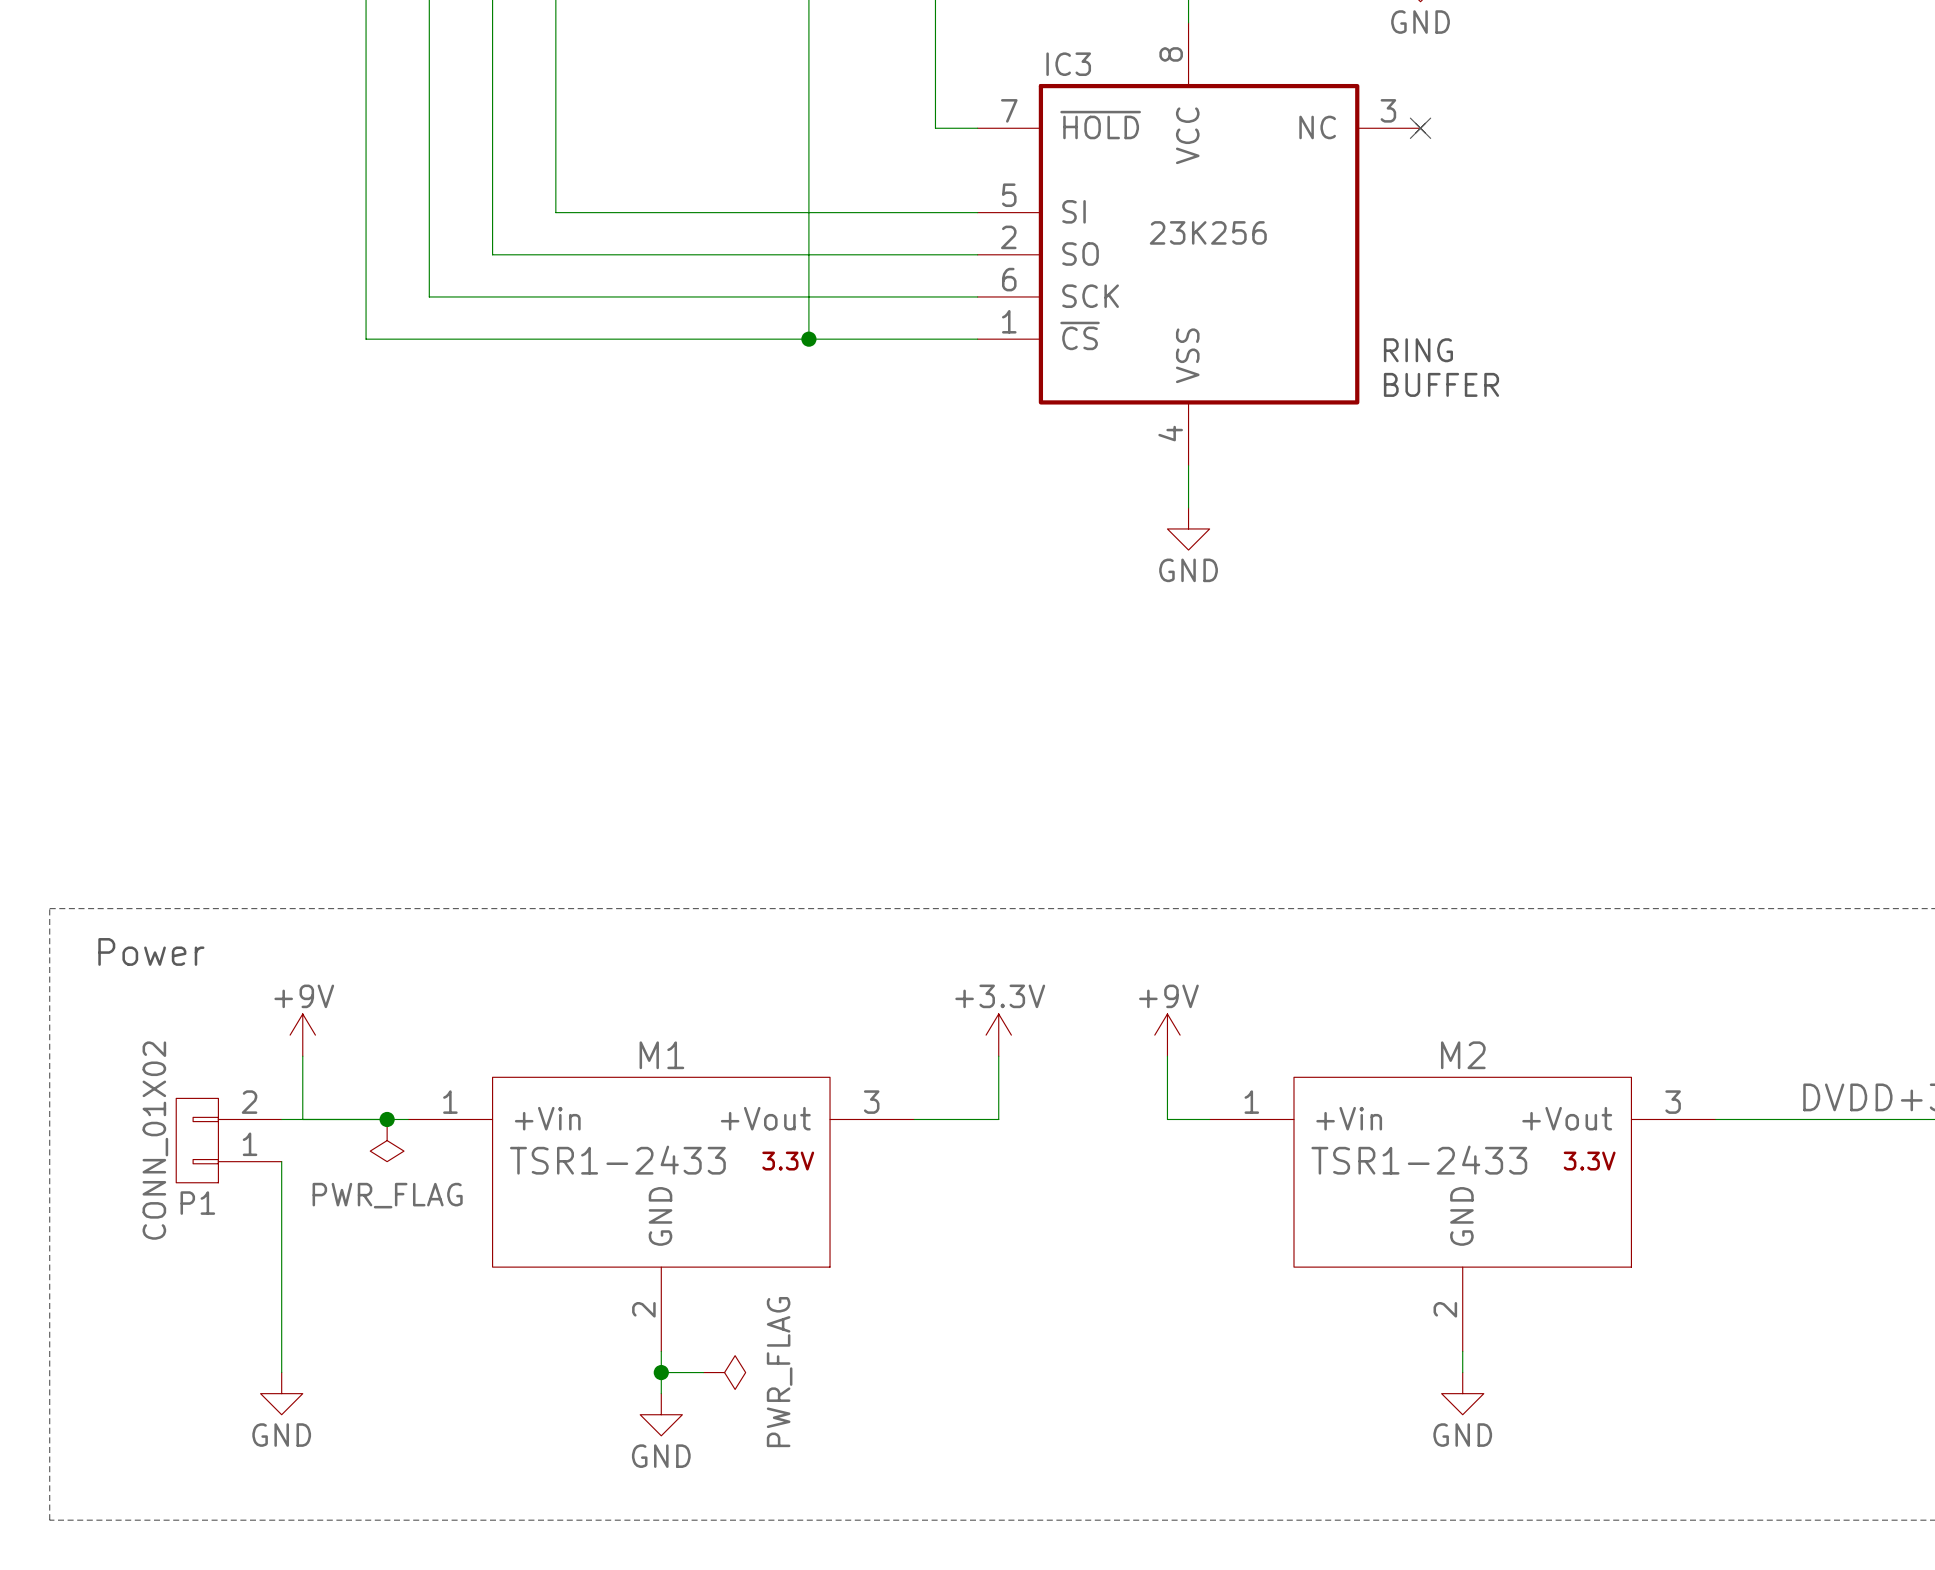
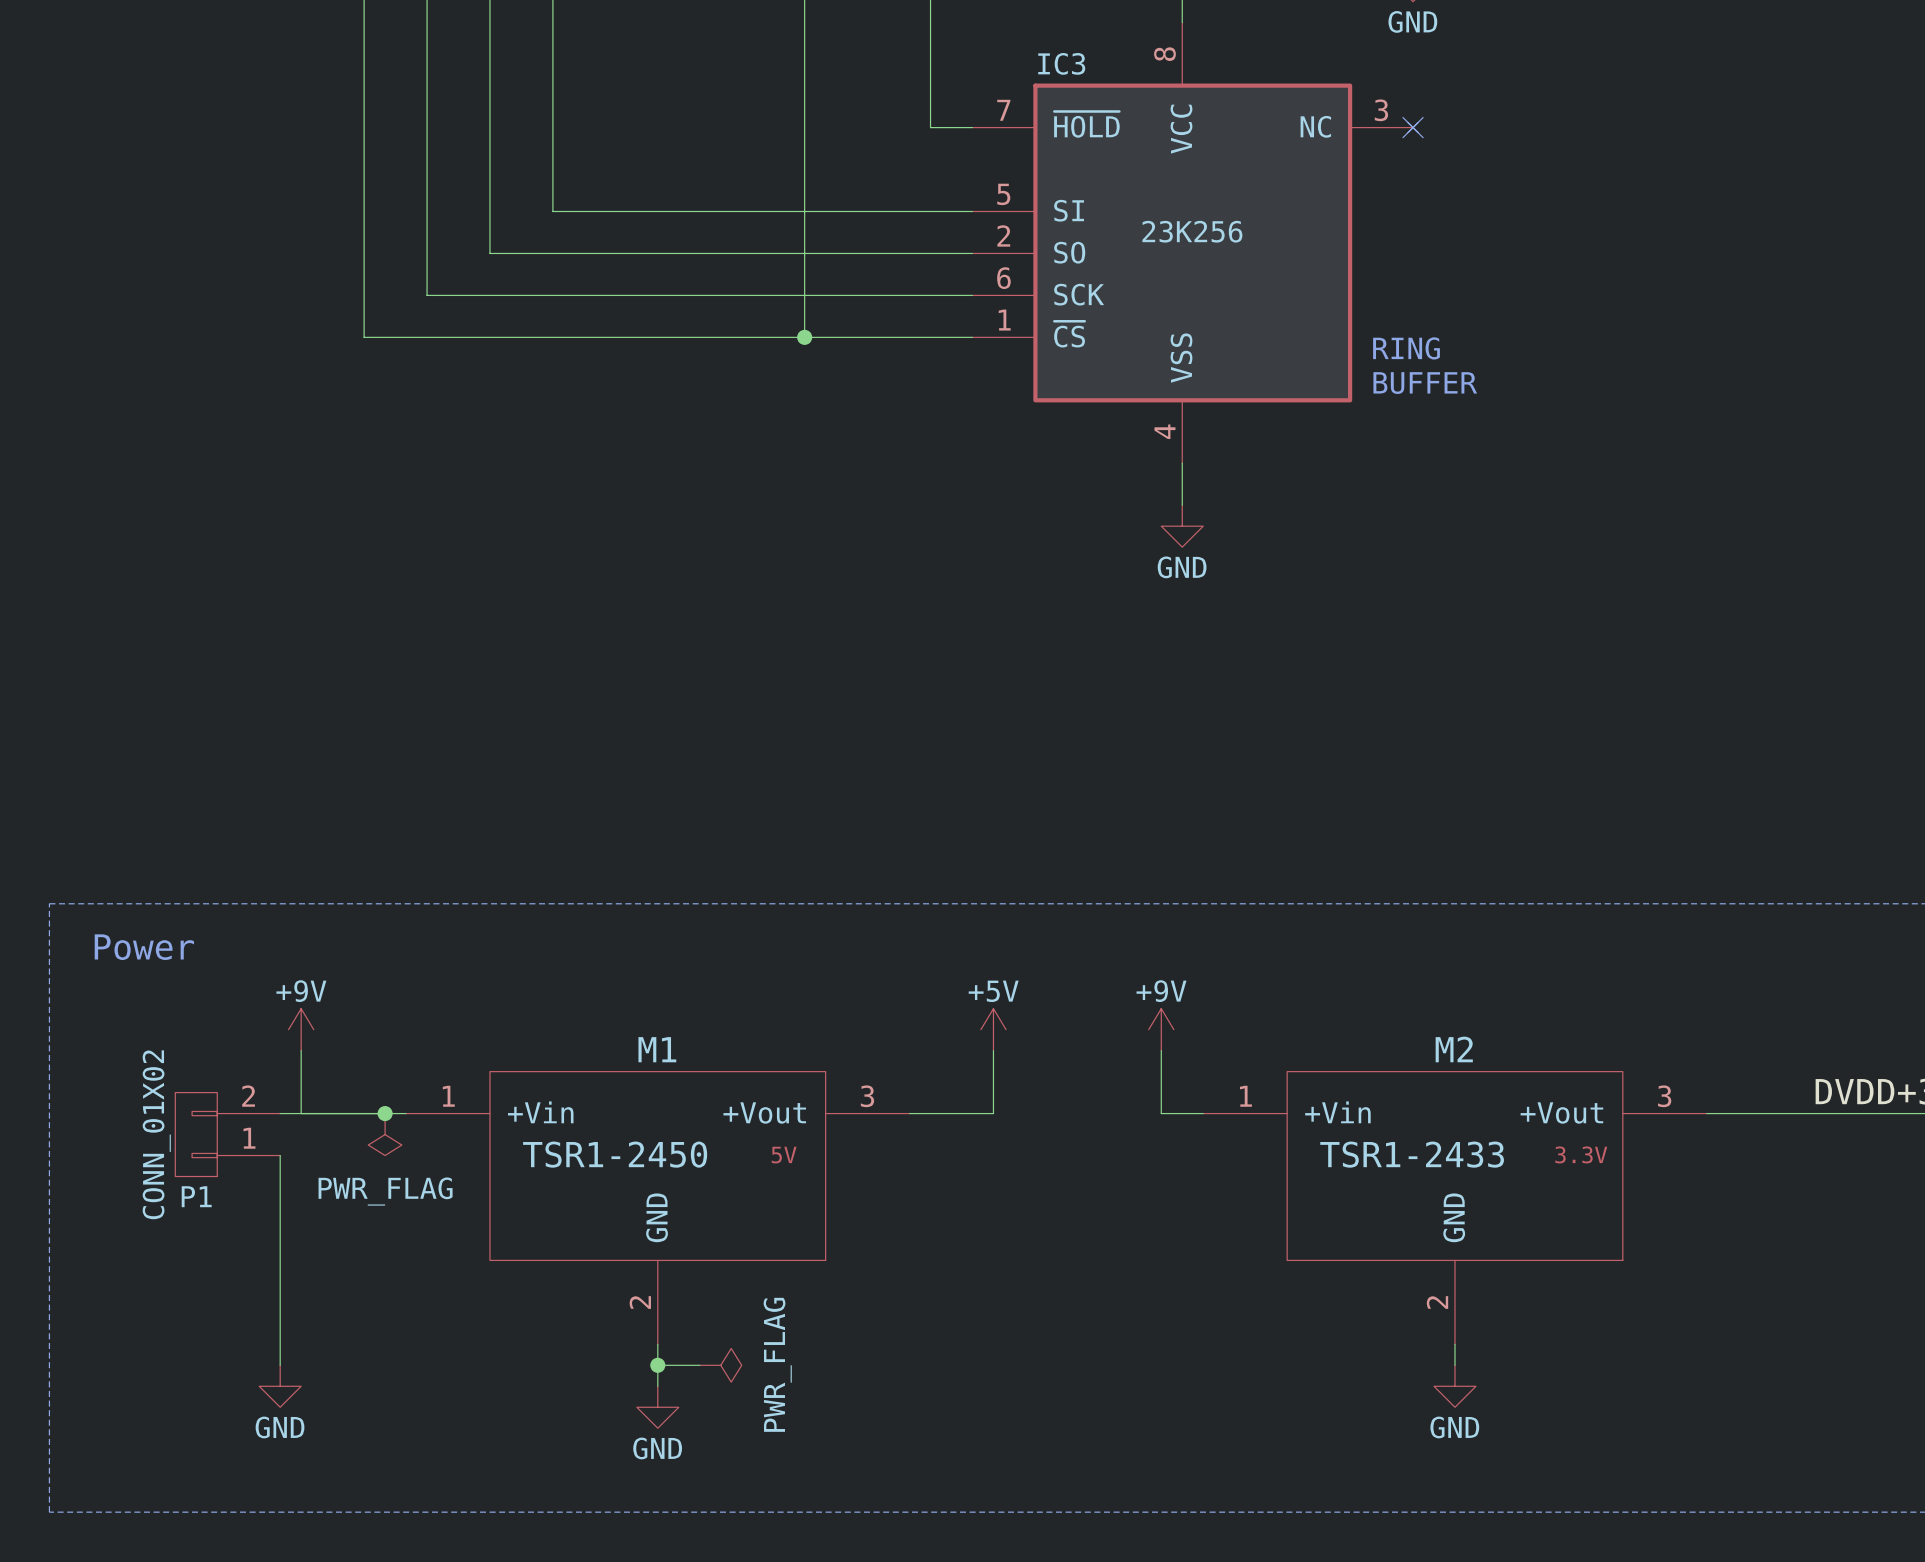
power symbol: +3.3V (998, 1035) -> +5V (993, 1029)
M1 value: TSR1-2433 (617, 1160) -> TSR1-2450 (615, 1154)
M1 text: 3.3V (788, 1161) -> 5V (784, 1155)

